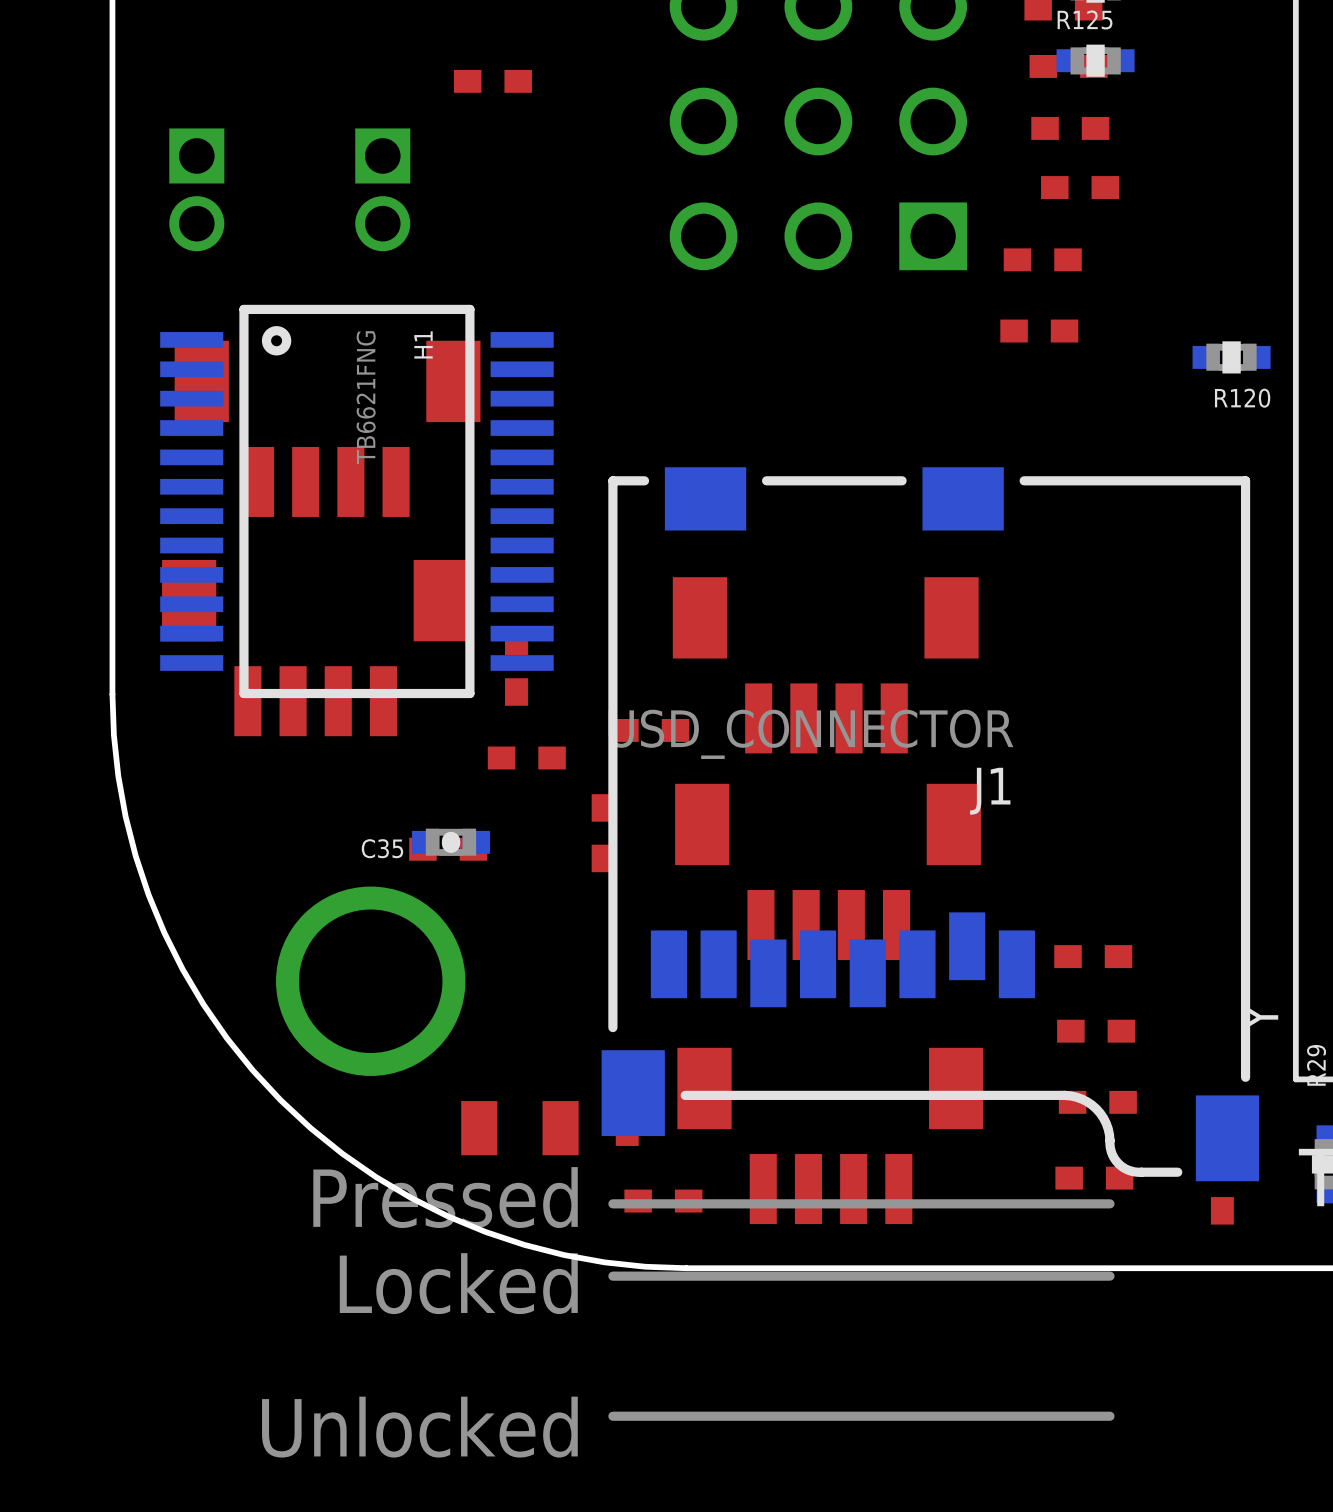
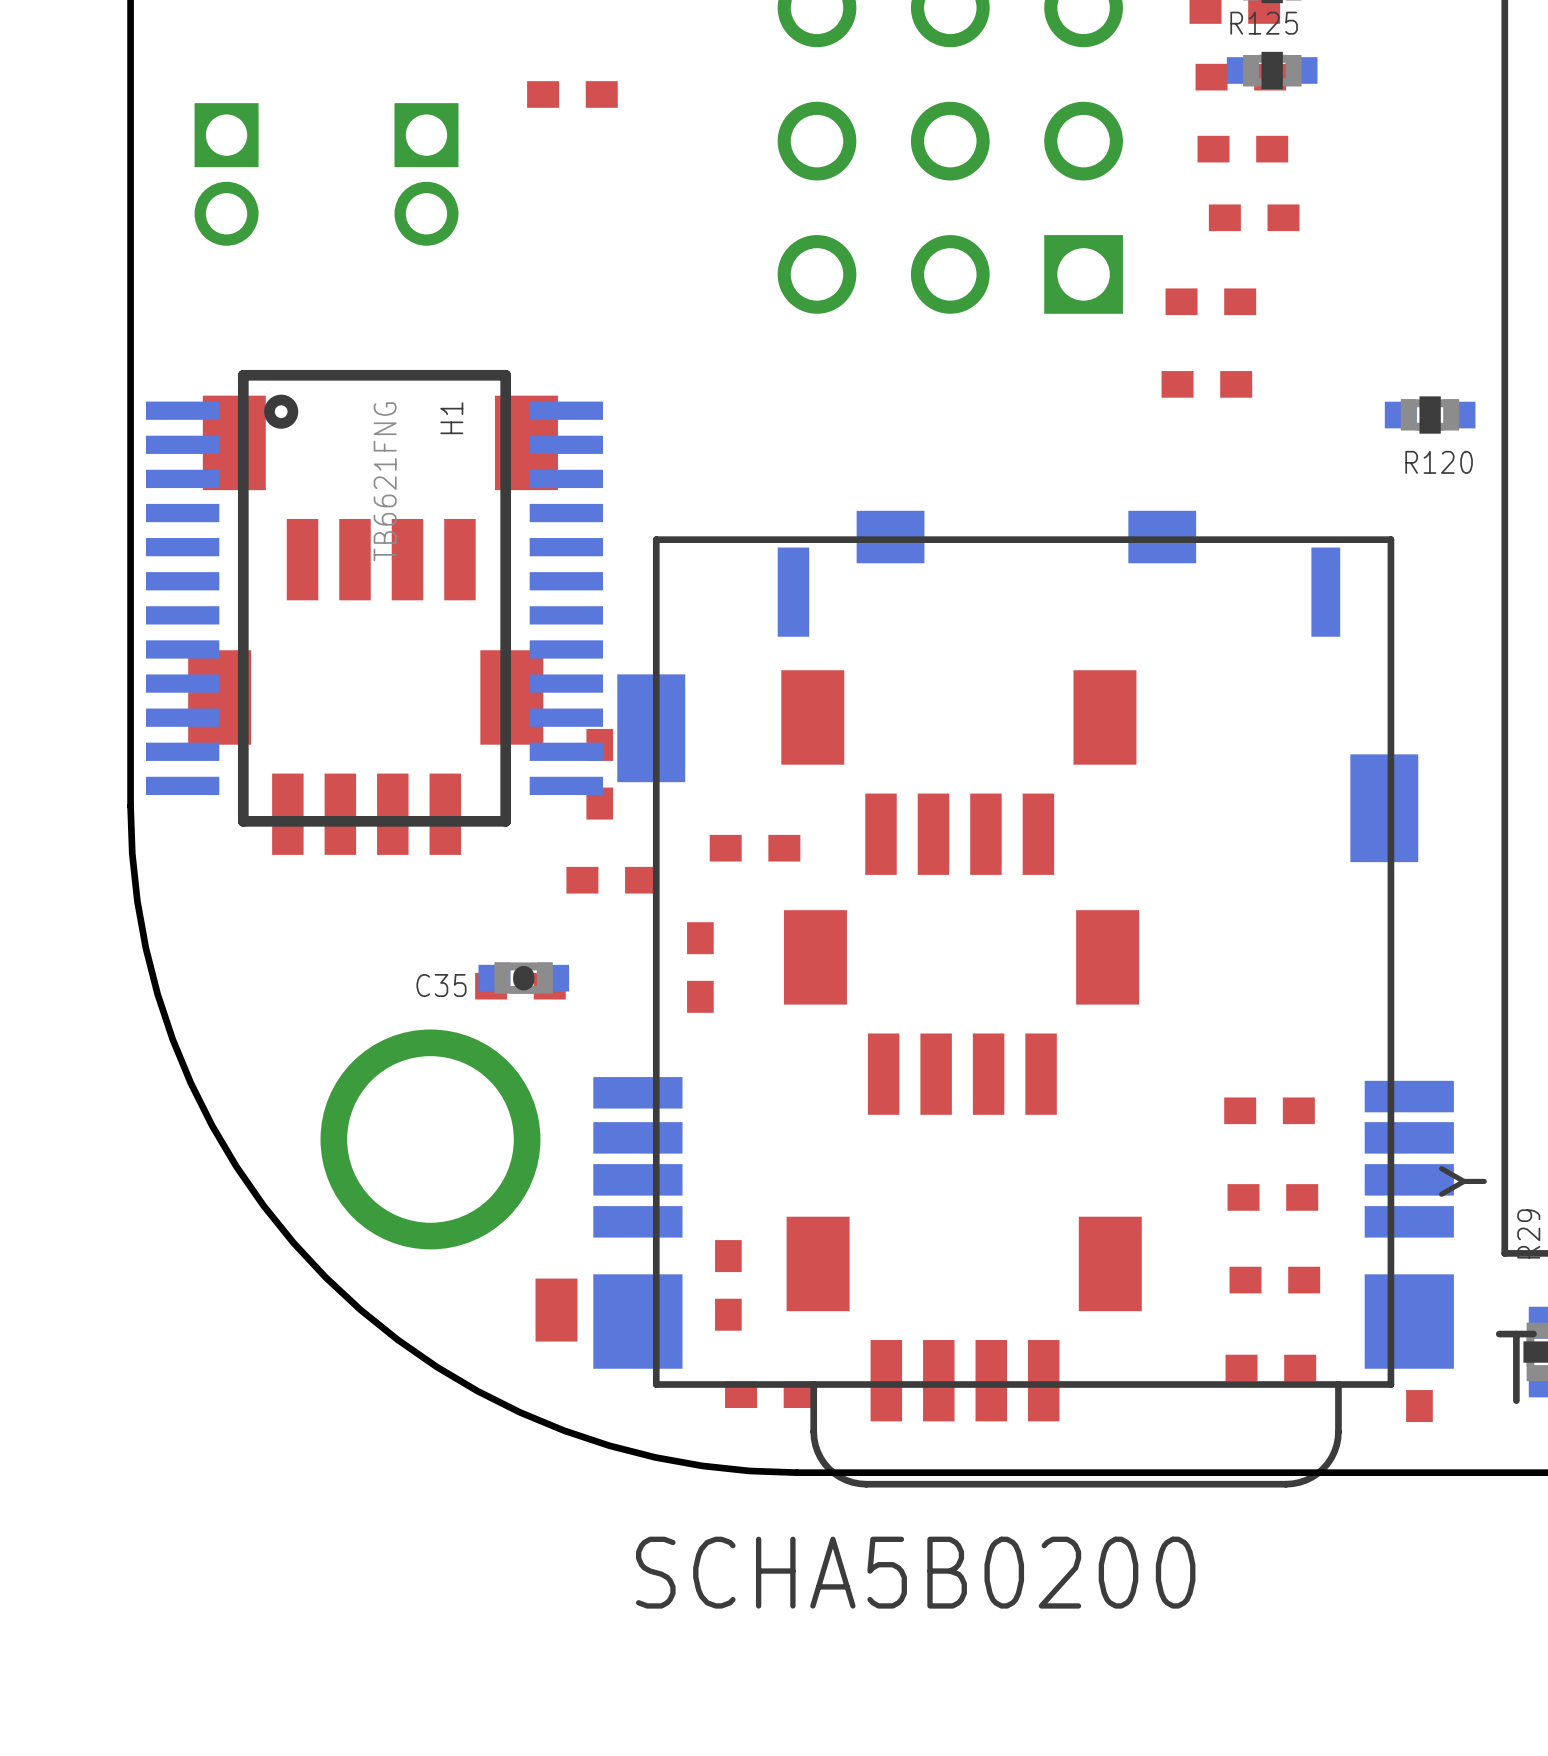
part position: (196, 189) -> (226, 174)
part position: (382, 189) -> (426, 174)
H1 position: (356, 501) -> (374, 598)
part: none -> (1023, 999)
J1: USD_CONNECTOR (930, 944) -> none

